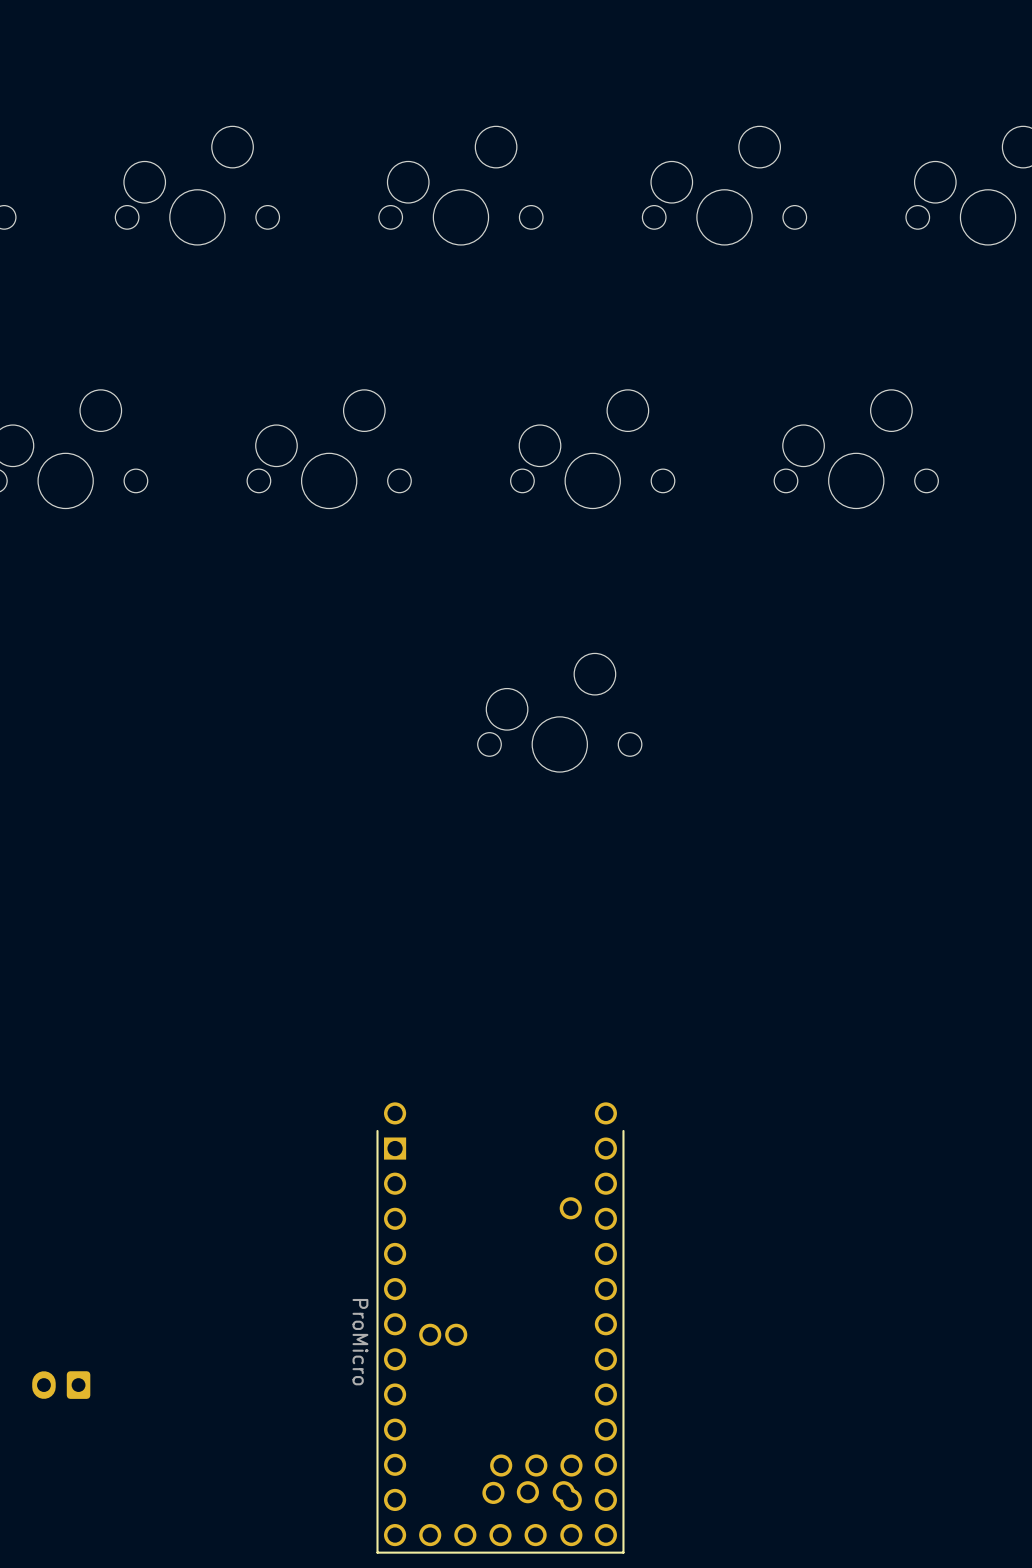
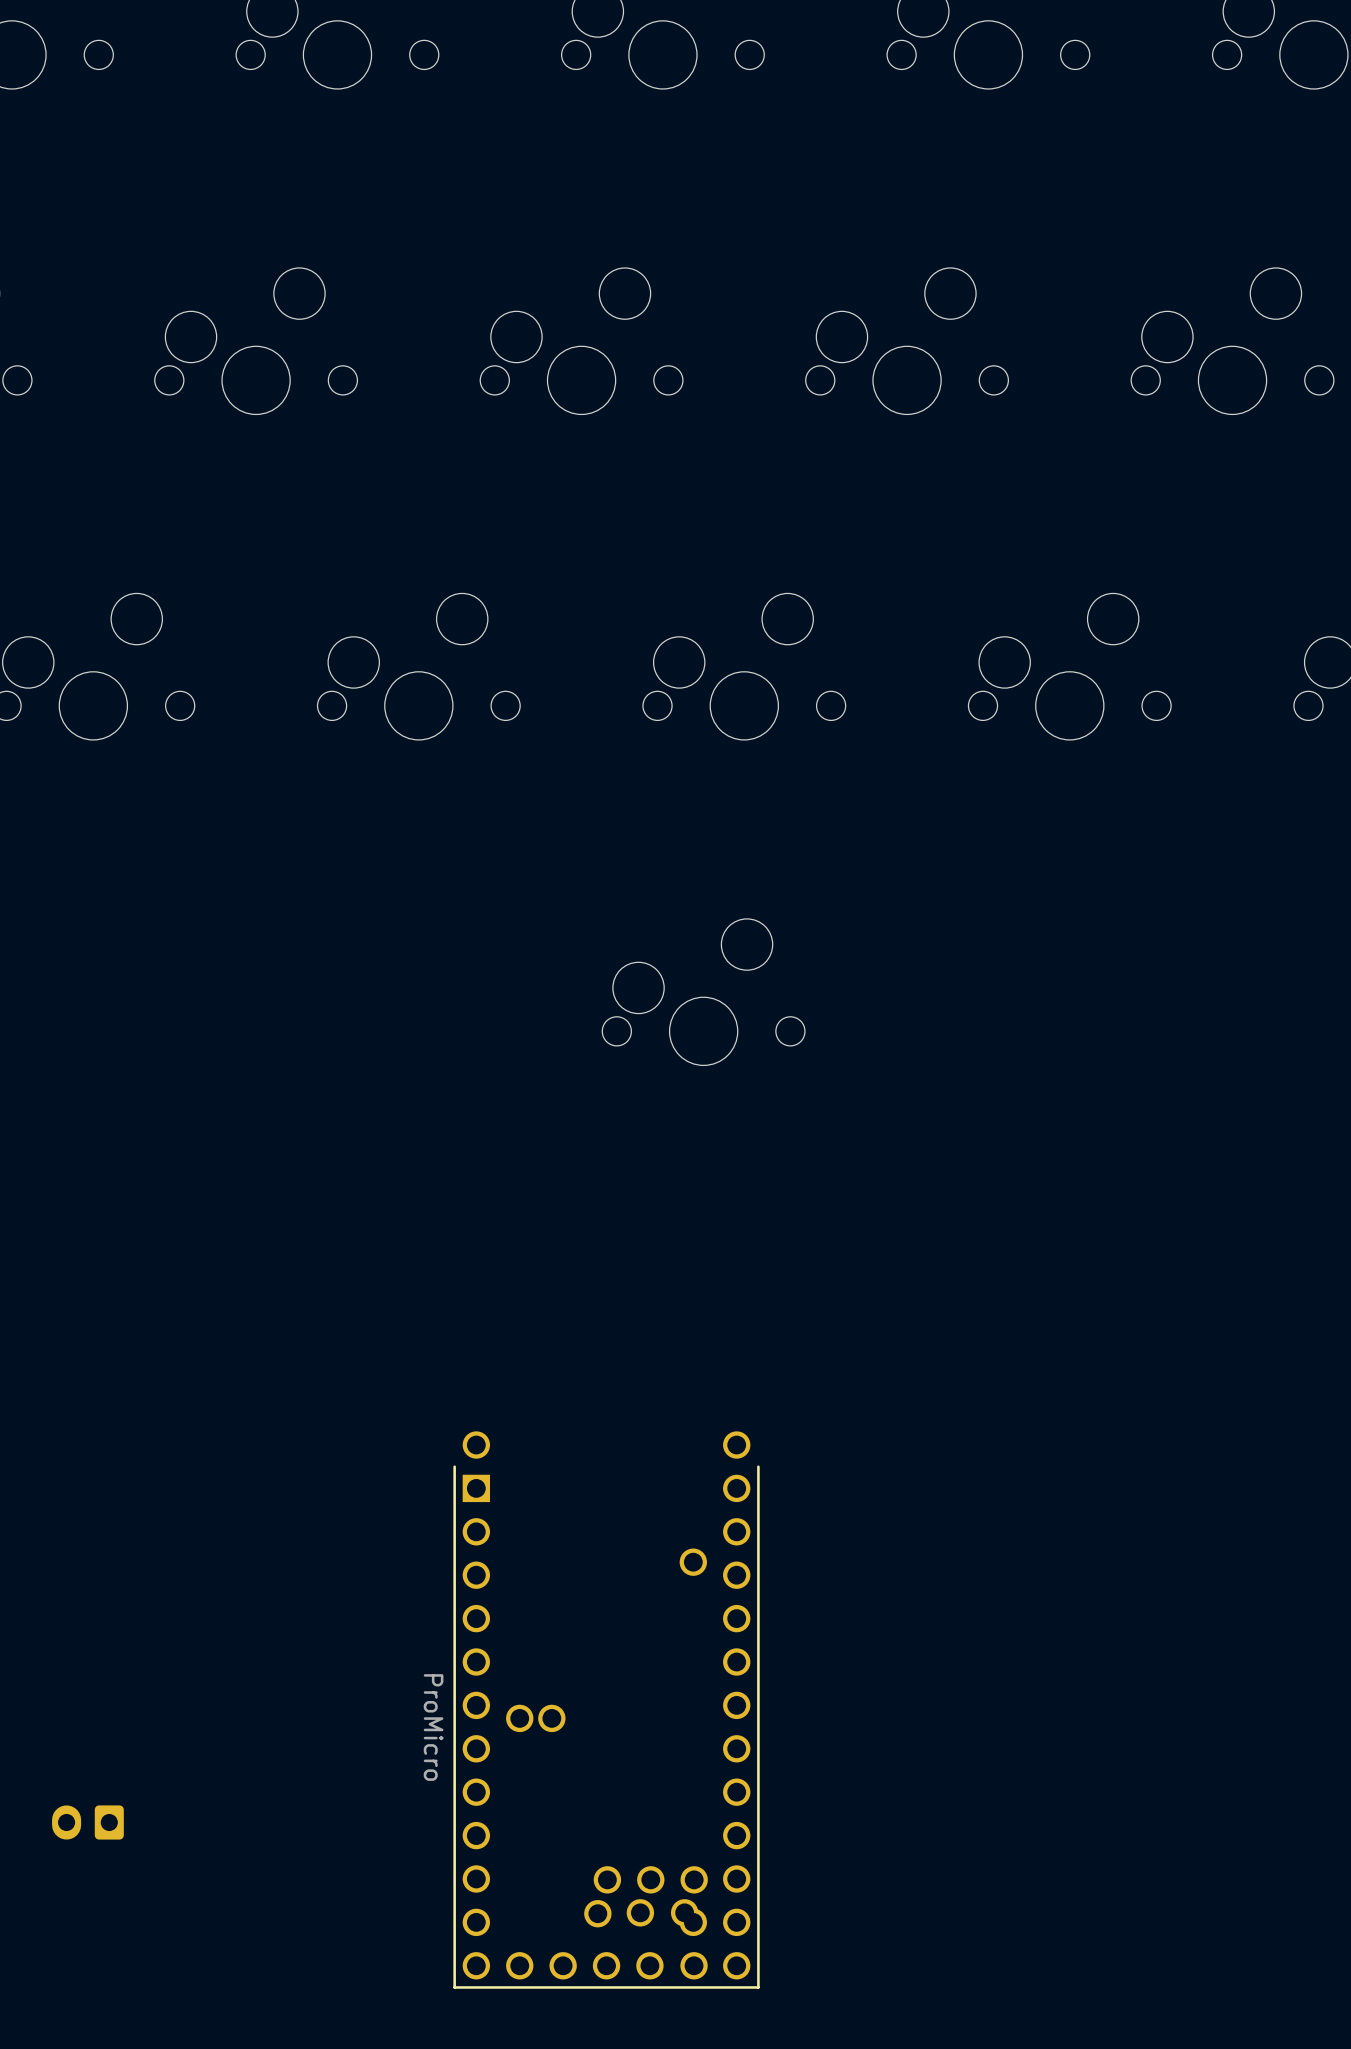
part position: (500, 1328) -> (606, 1710)

